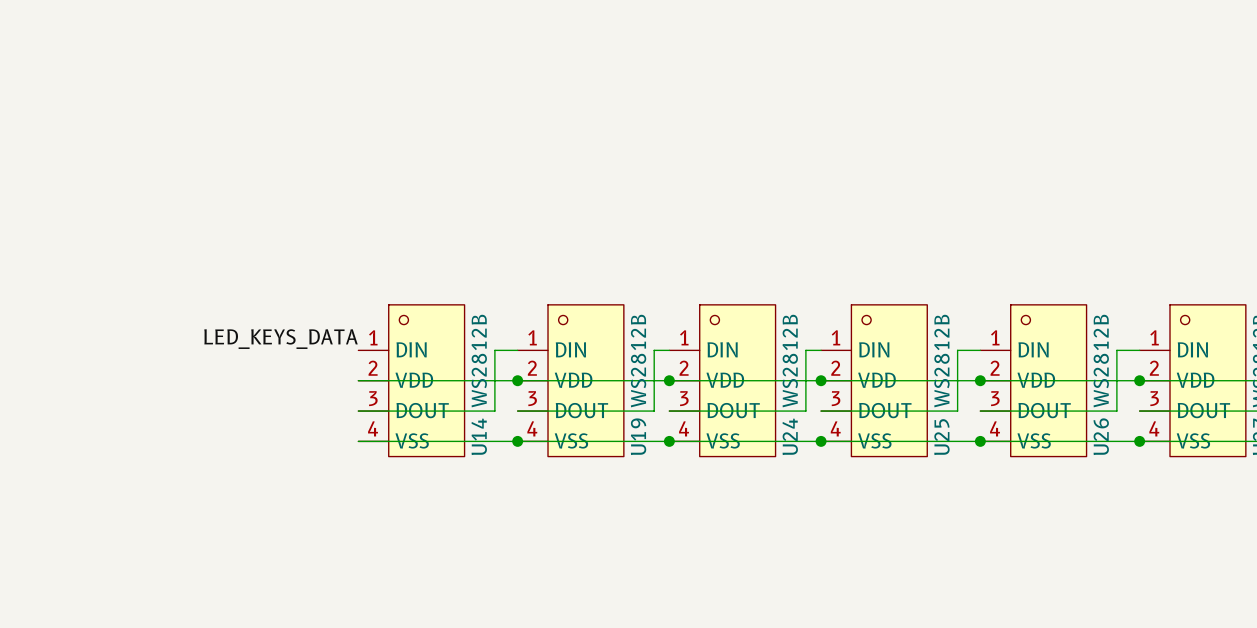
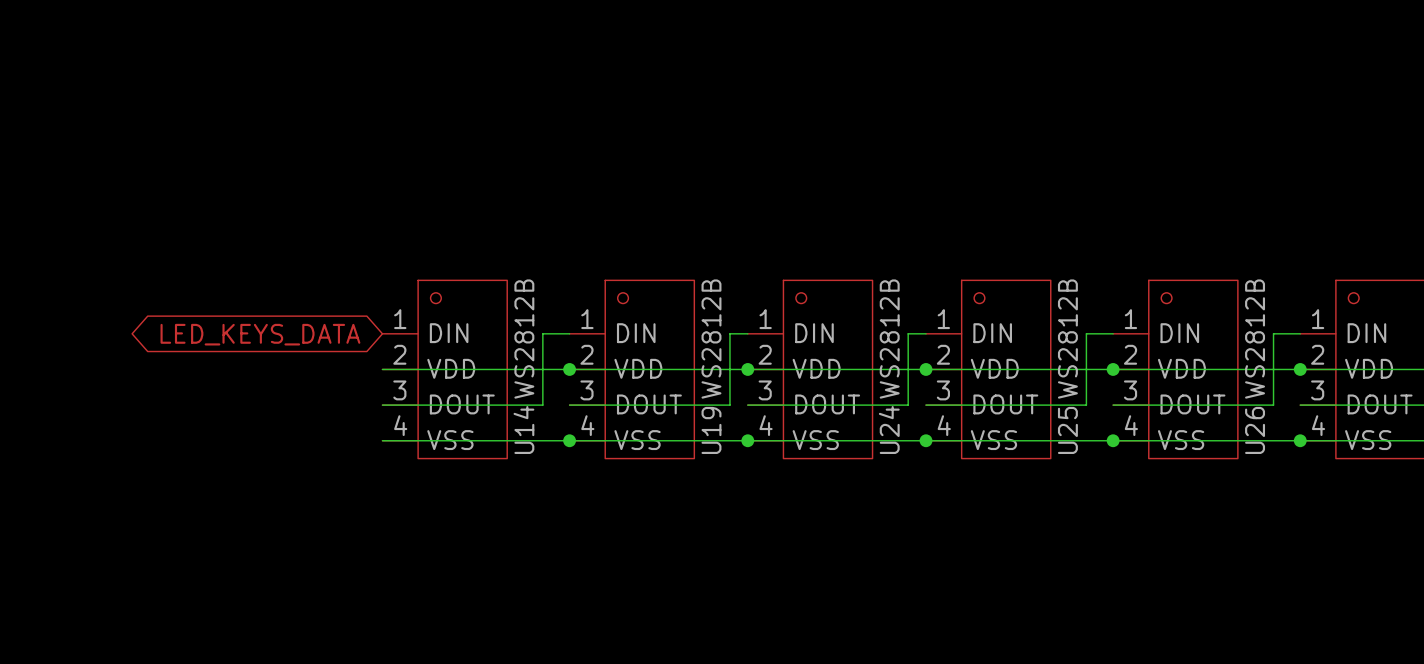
label: LED_KEYS_DATA (281, 339) -> none
global label: none -> LED_KEYS_DATA (260, 334)

